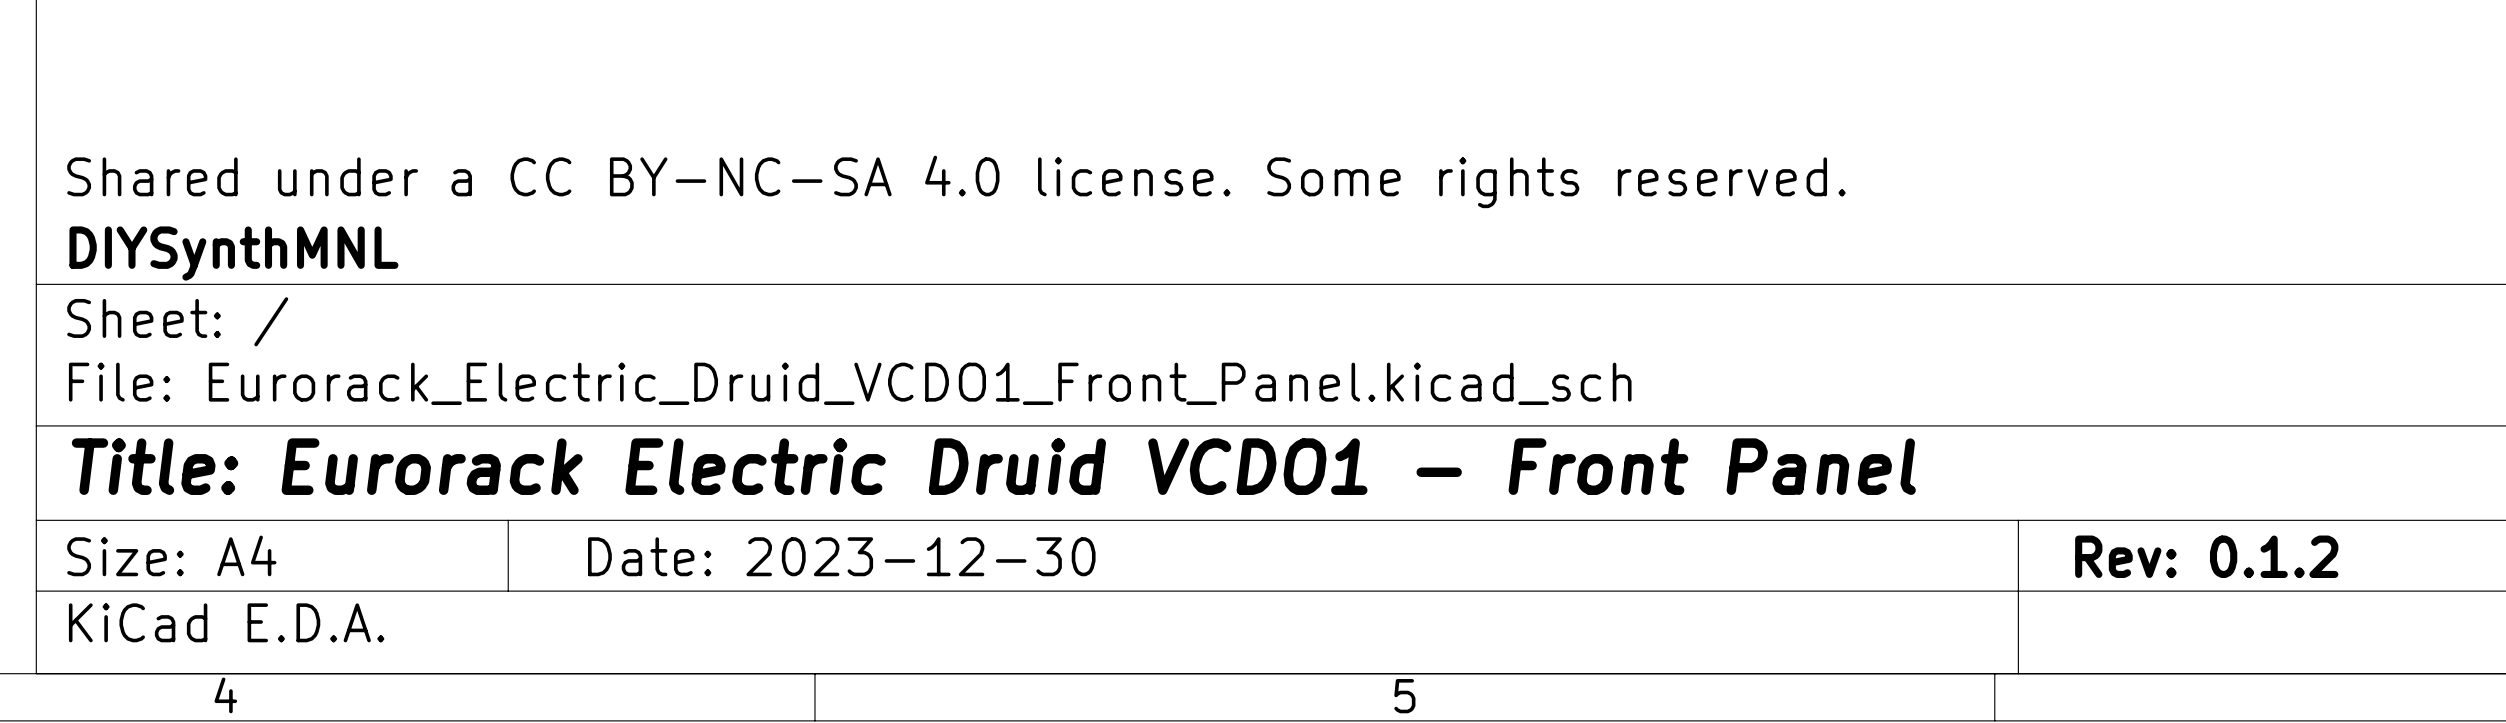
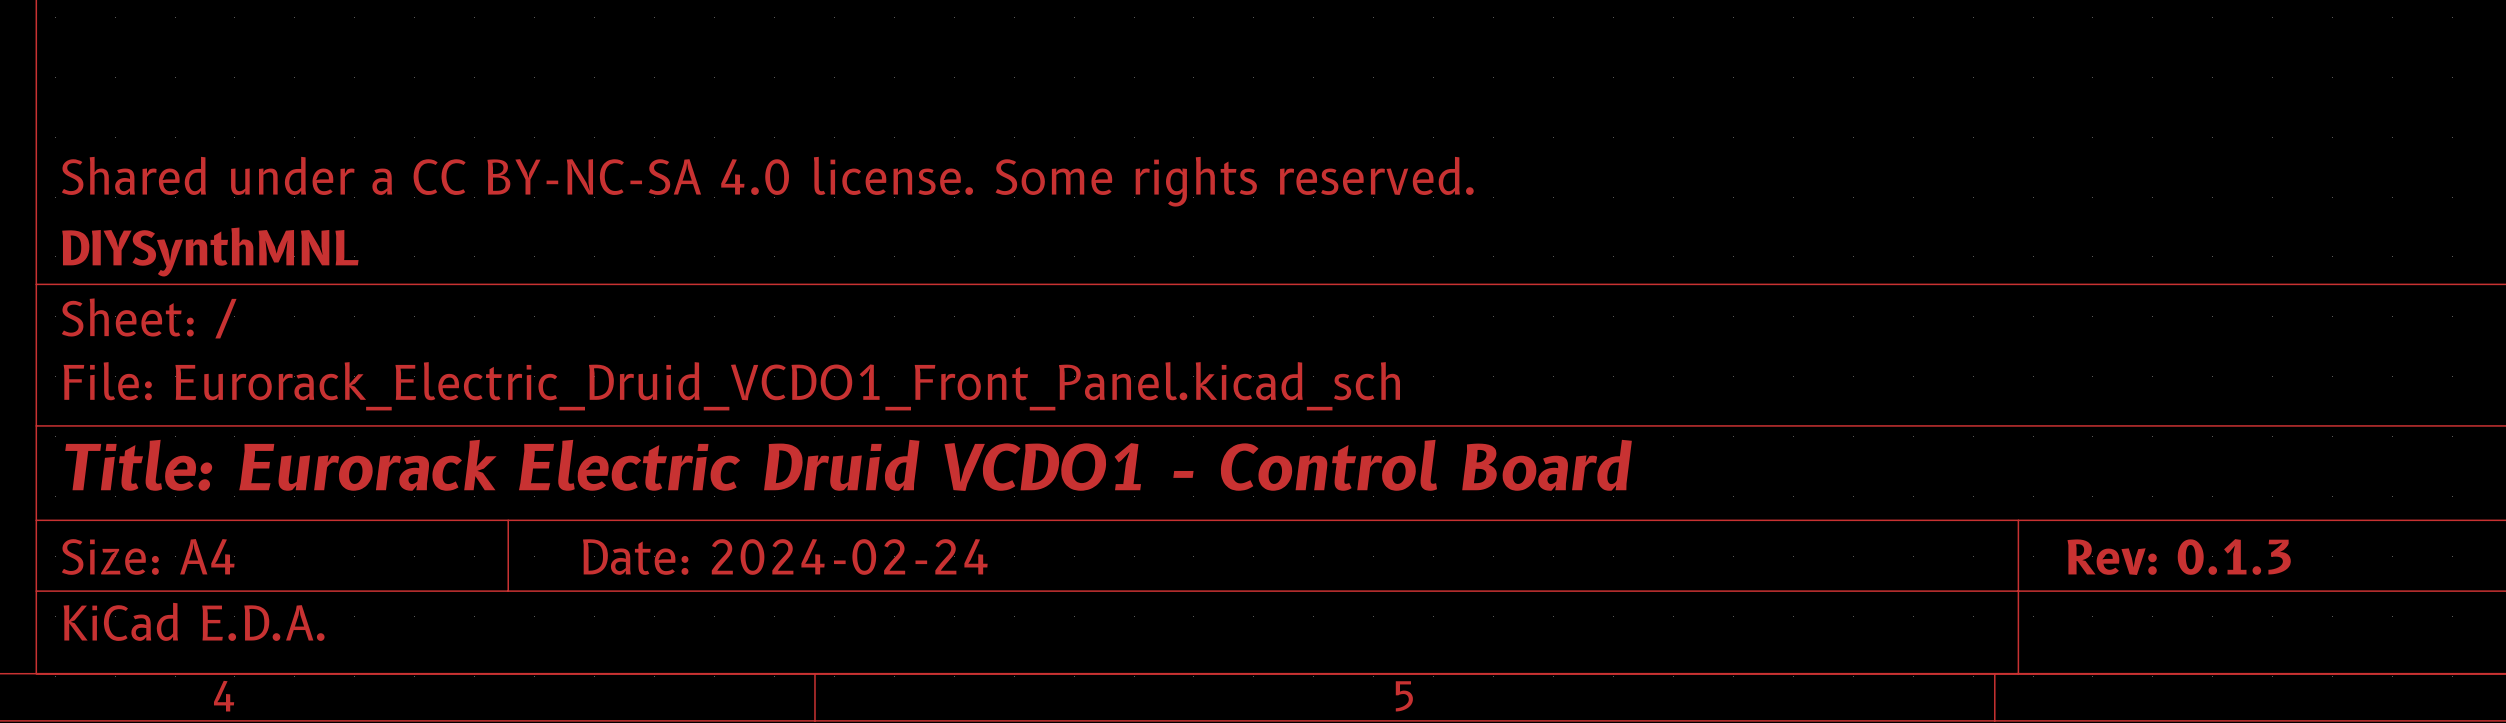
title block: Title: Eurorack Electric Druid VCDO1 - Front Panel (993, 466) -> Title: Eurorack Electric Druid VCDO1 - Control Board (848, 465)
title block: Date: 2023-12-30 (841, 556) -> Date: 2024-02-24 (785, 556)
title block: Rev: 0.1.2 (2206, 556) -> Rev: 0.1.3 (2179, 557)

